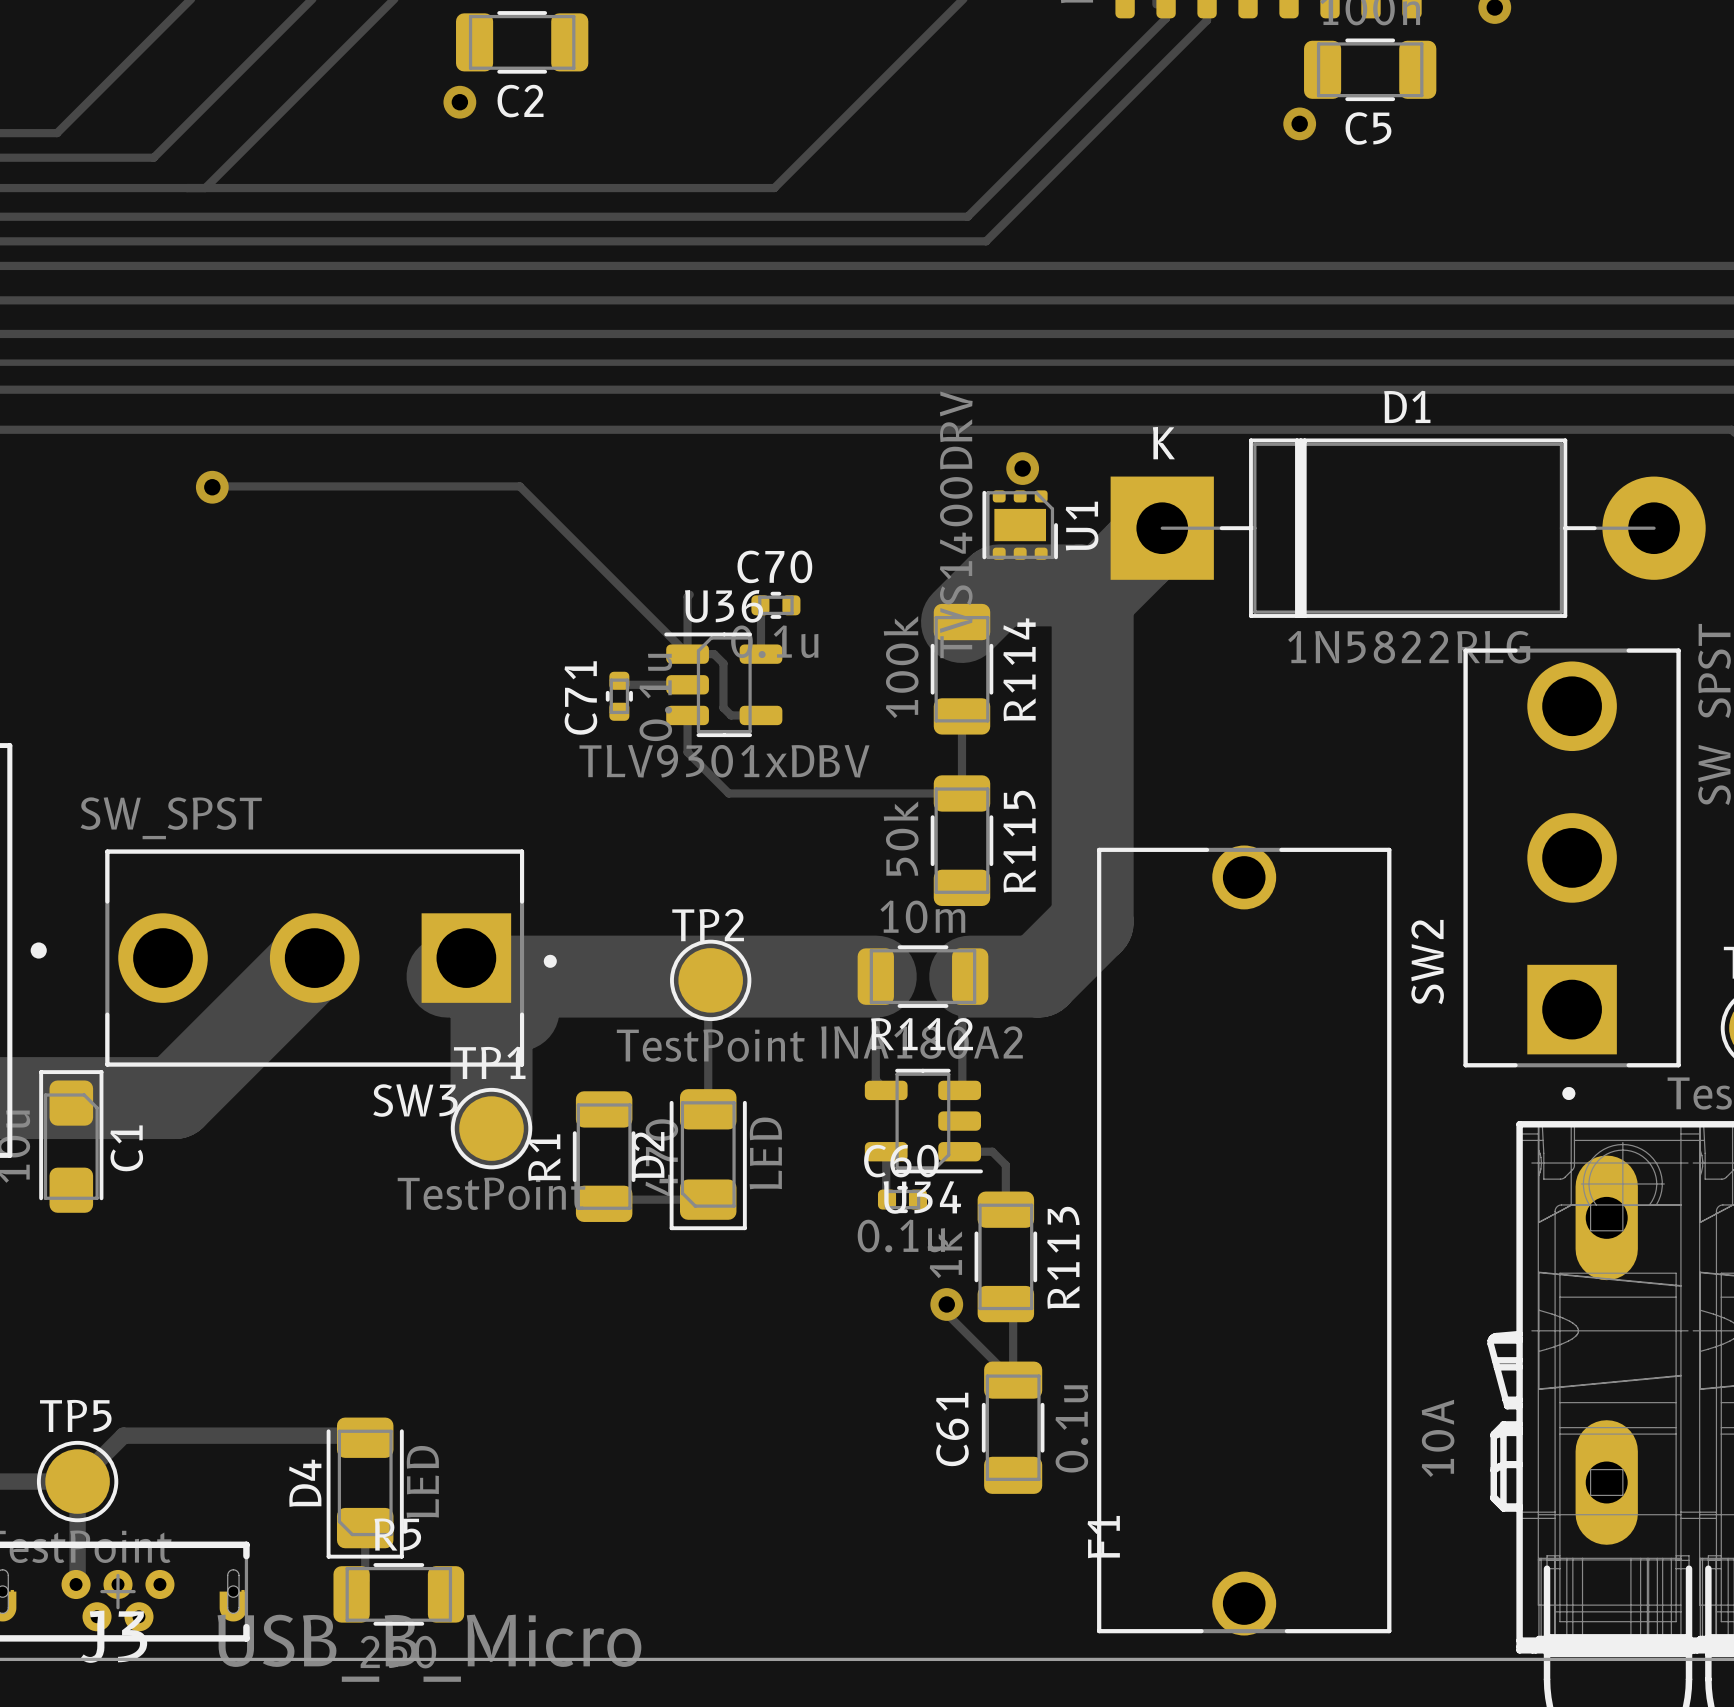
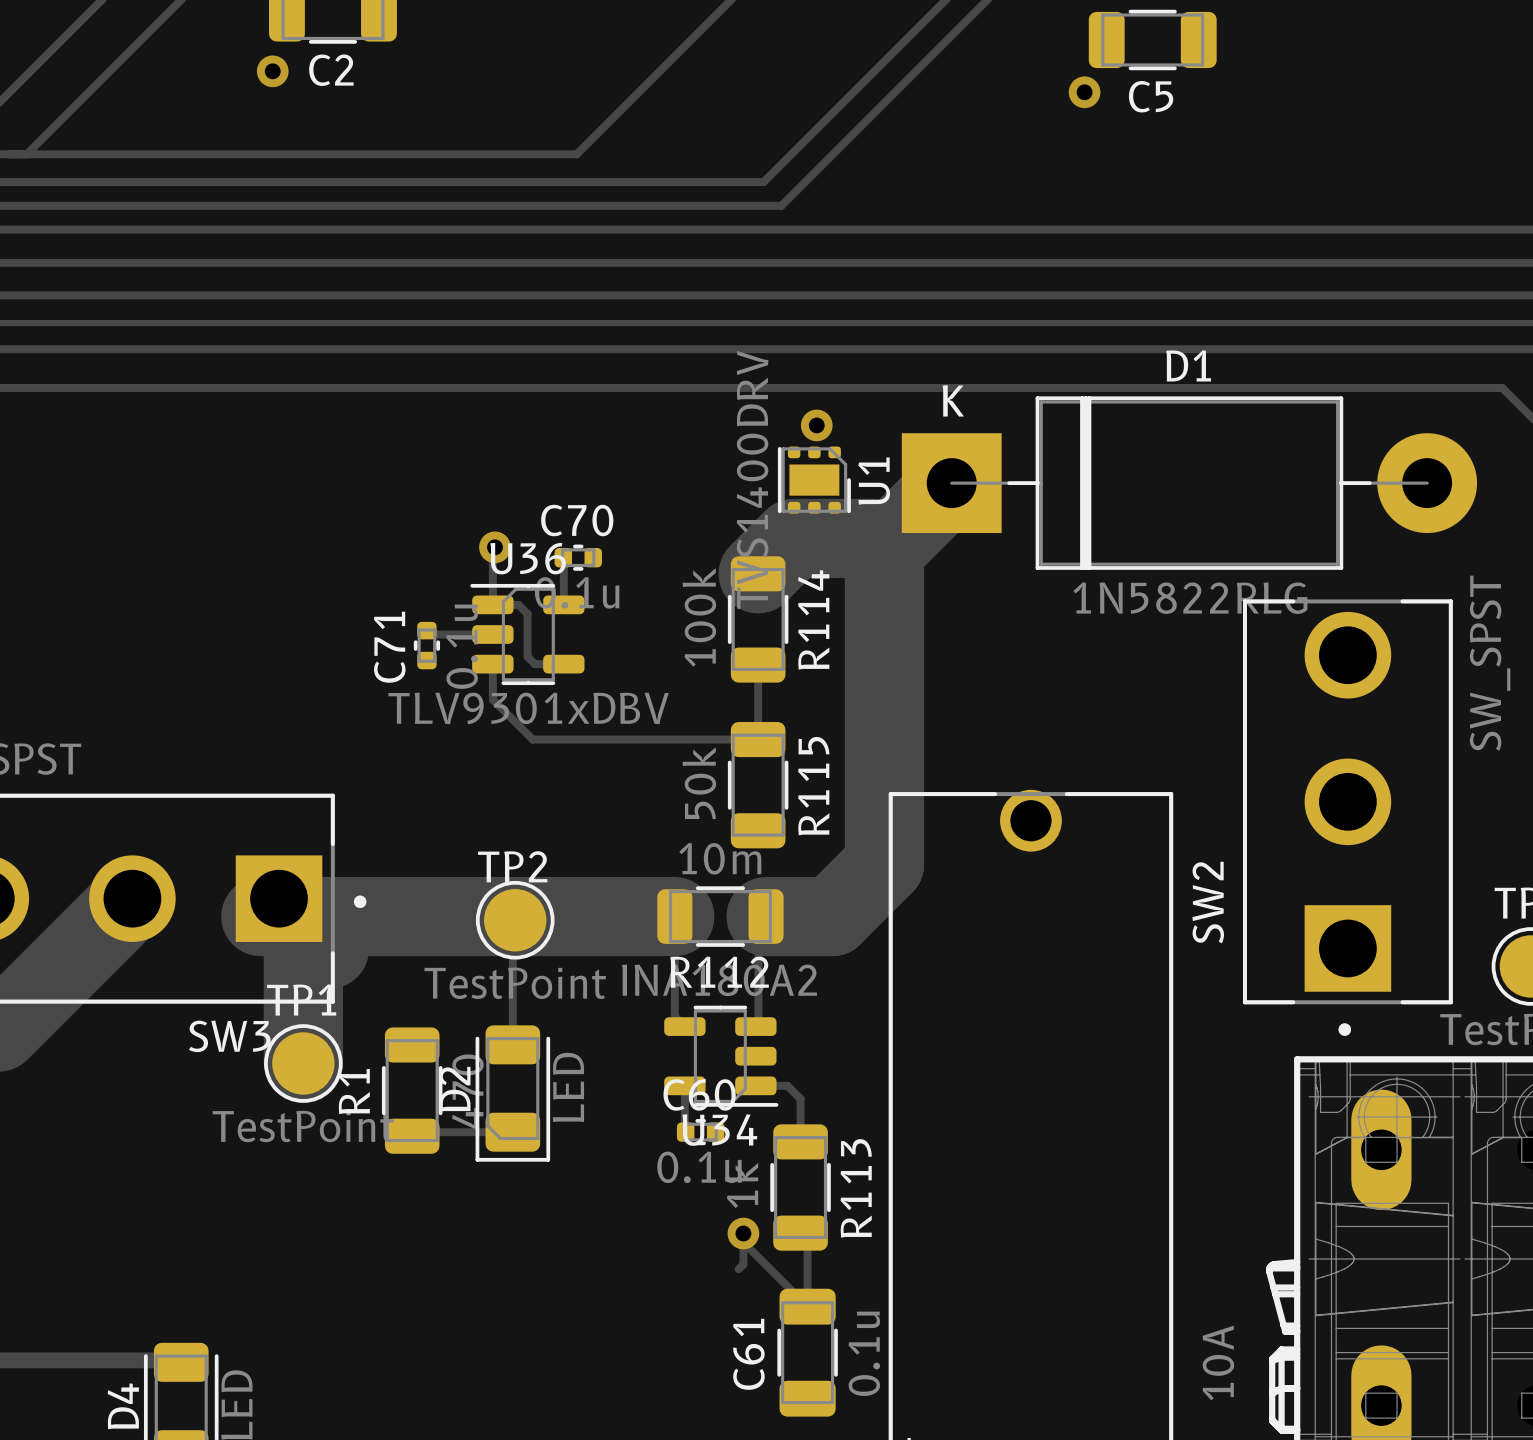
track: (213, 486) (212, 487) (519, 486) (687, 654) -> none
via: (212, 487) -> none
via: none -> (494, 547)
track: none -> (743, 1242) (743, 1264) (738, 1269)

